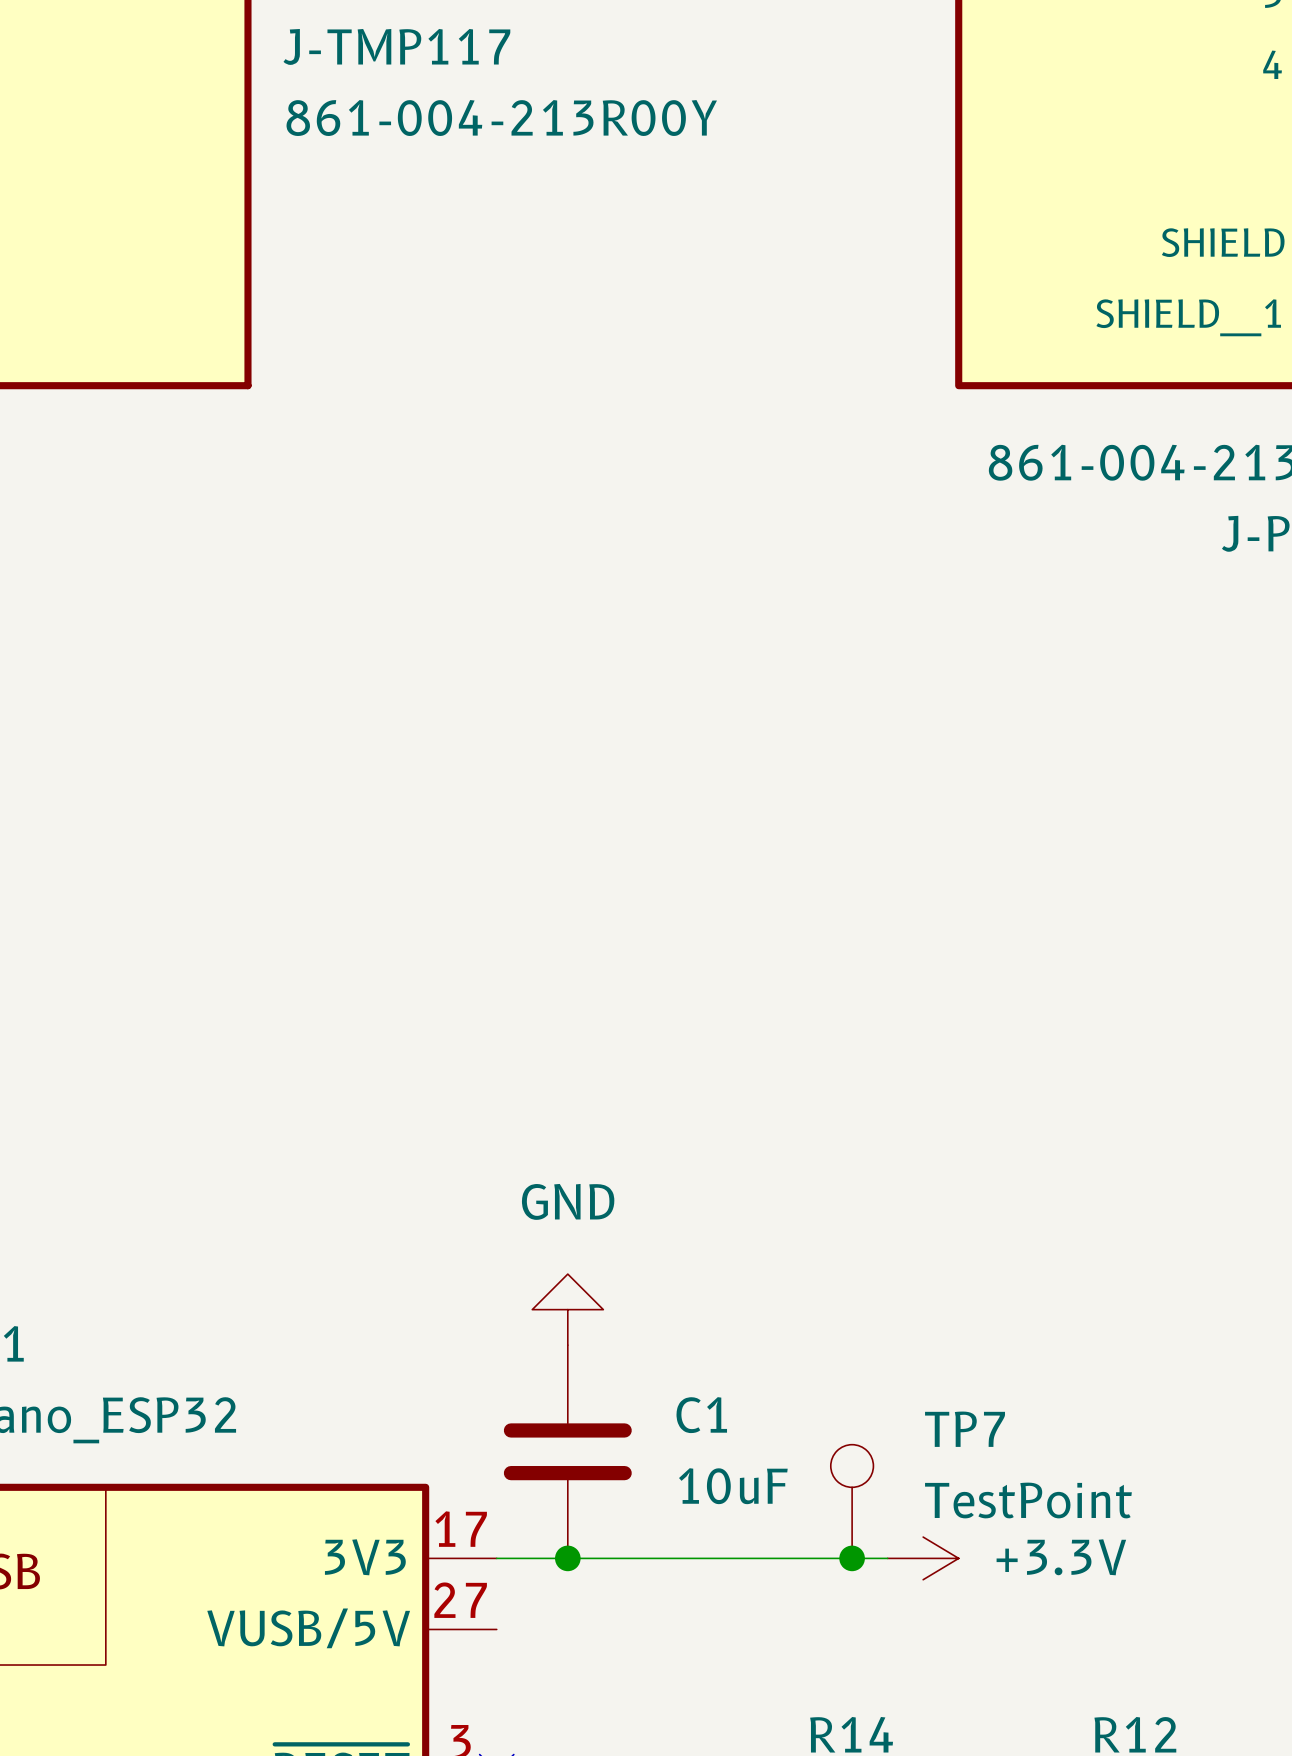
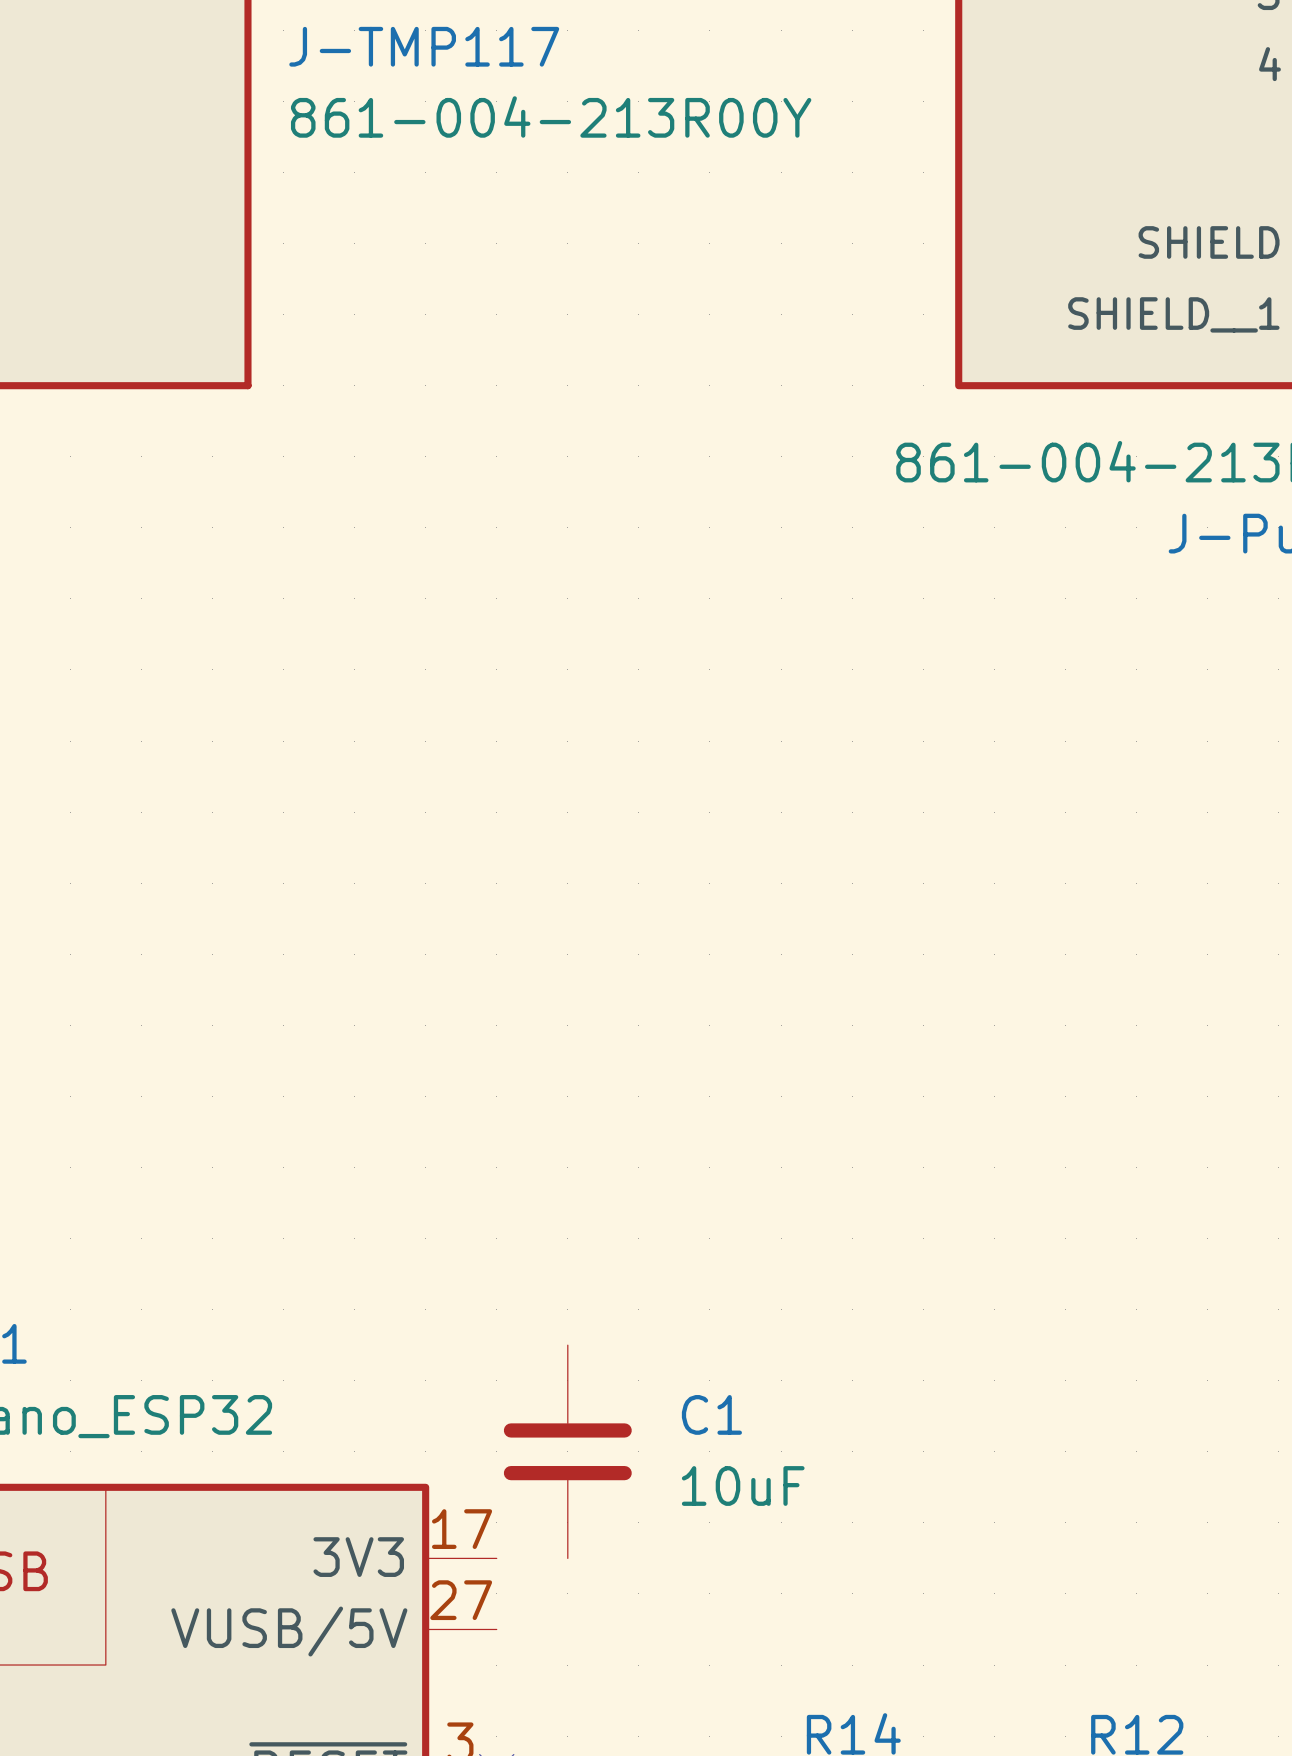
power symbol: GND (567, 1309) -> none
TP7: TestPoint (852, 1501) -> none
wire: (496, 1558) (887, 1558) -> none
junction: (567, 1558) -> none
junction: (852, 1558) -> none
power symbol: +3.3V (923, 1558) -> none

